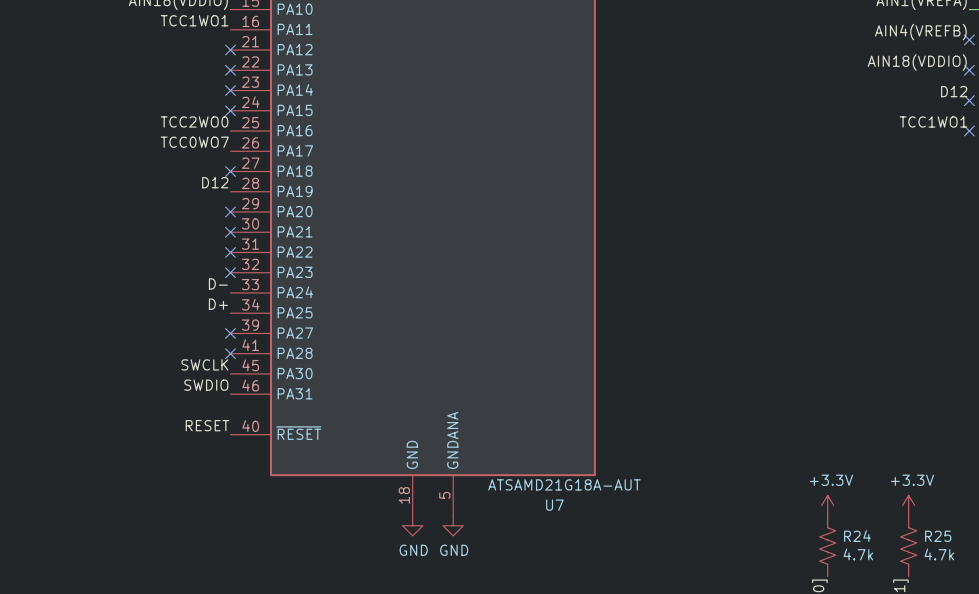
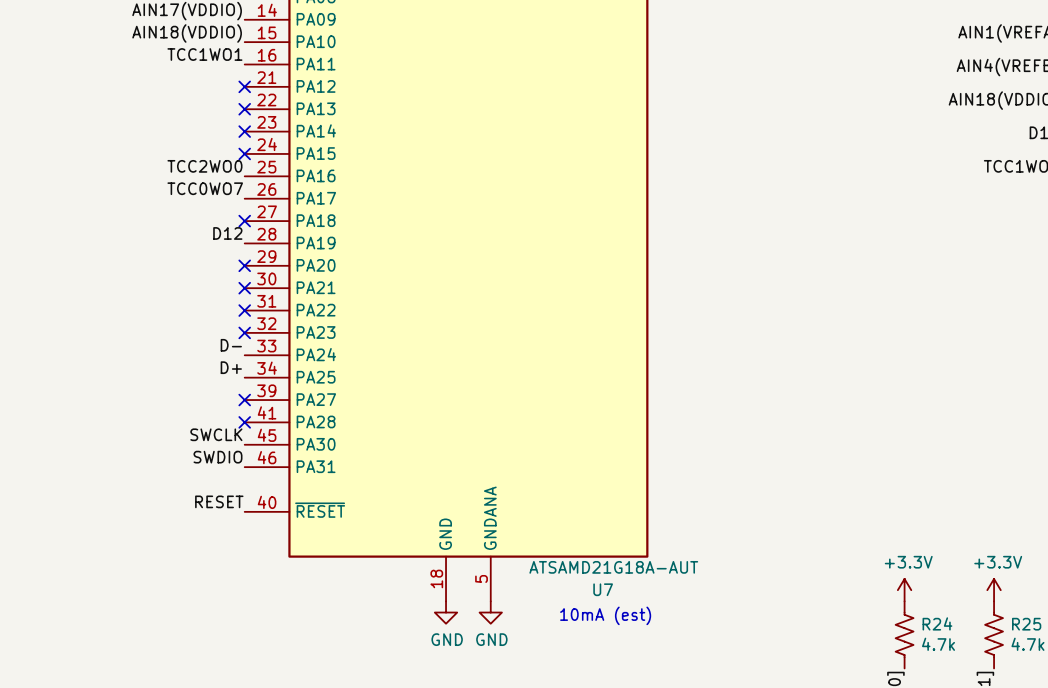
text: none -> 10mA (est) (605, 615)

